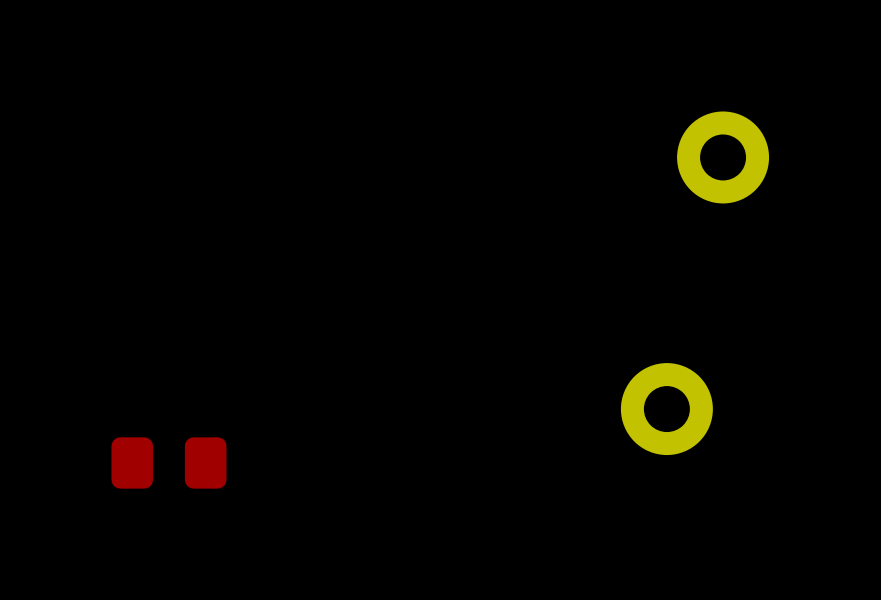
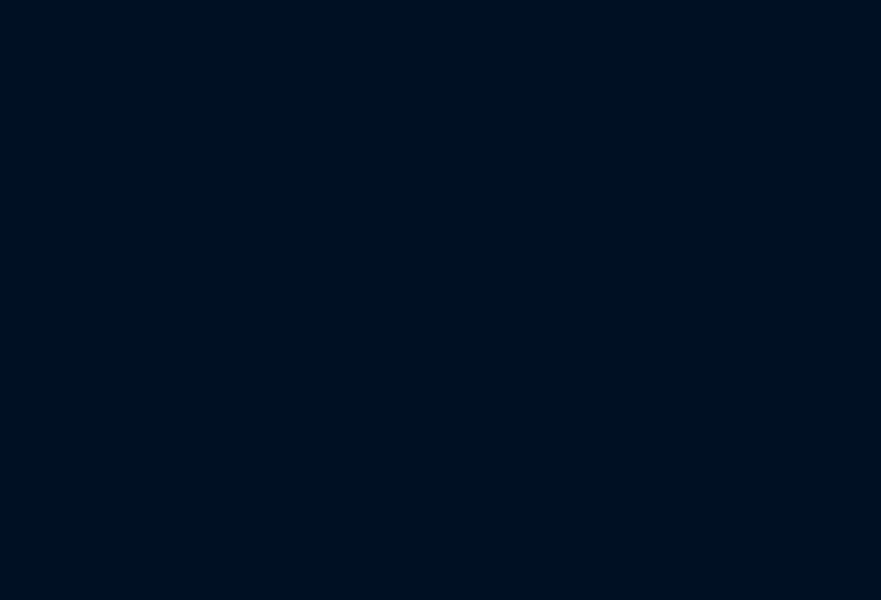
part: (723, 157) -> none
part: (666, 409) -> none
part: (168, 462) -> none

